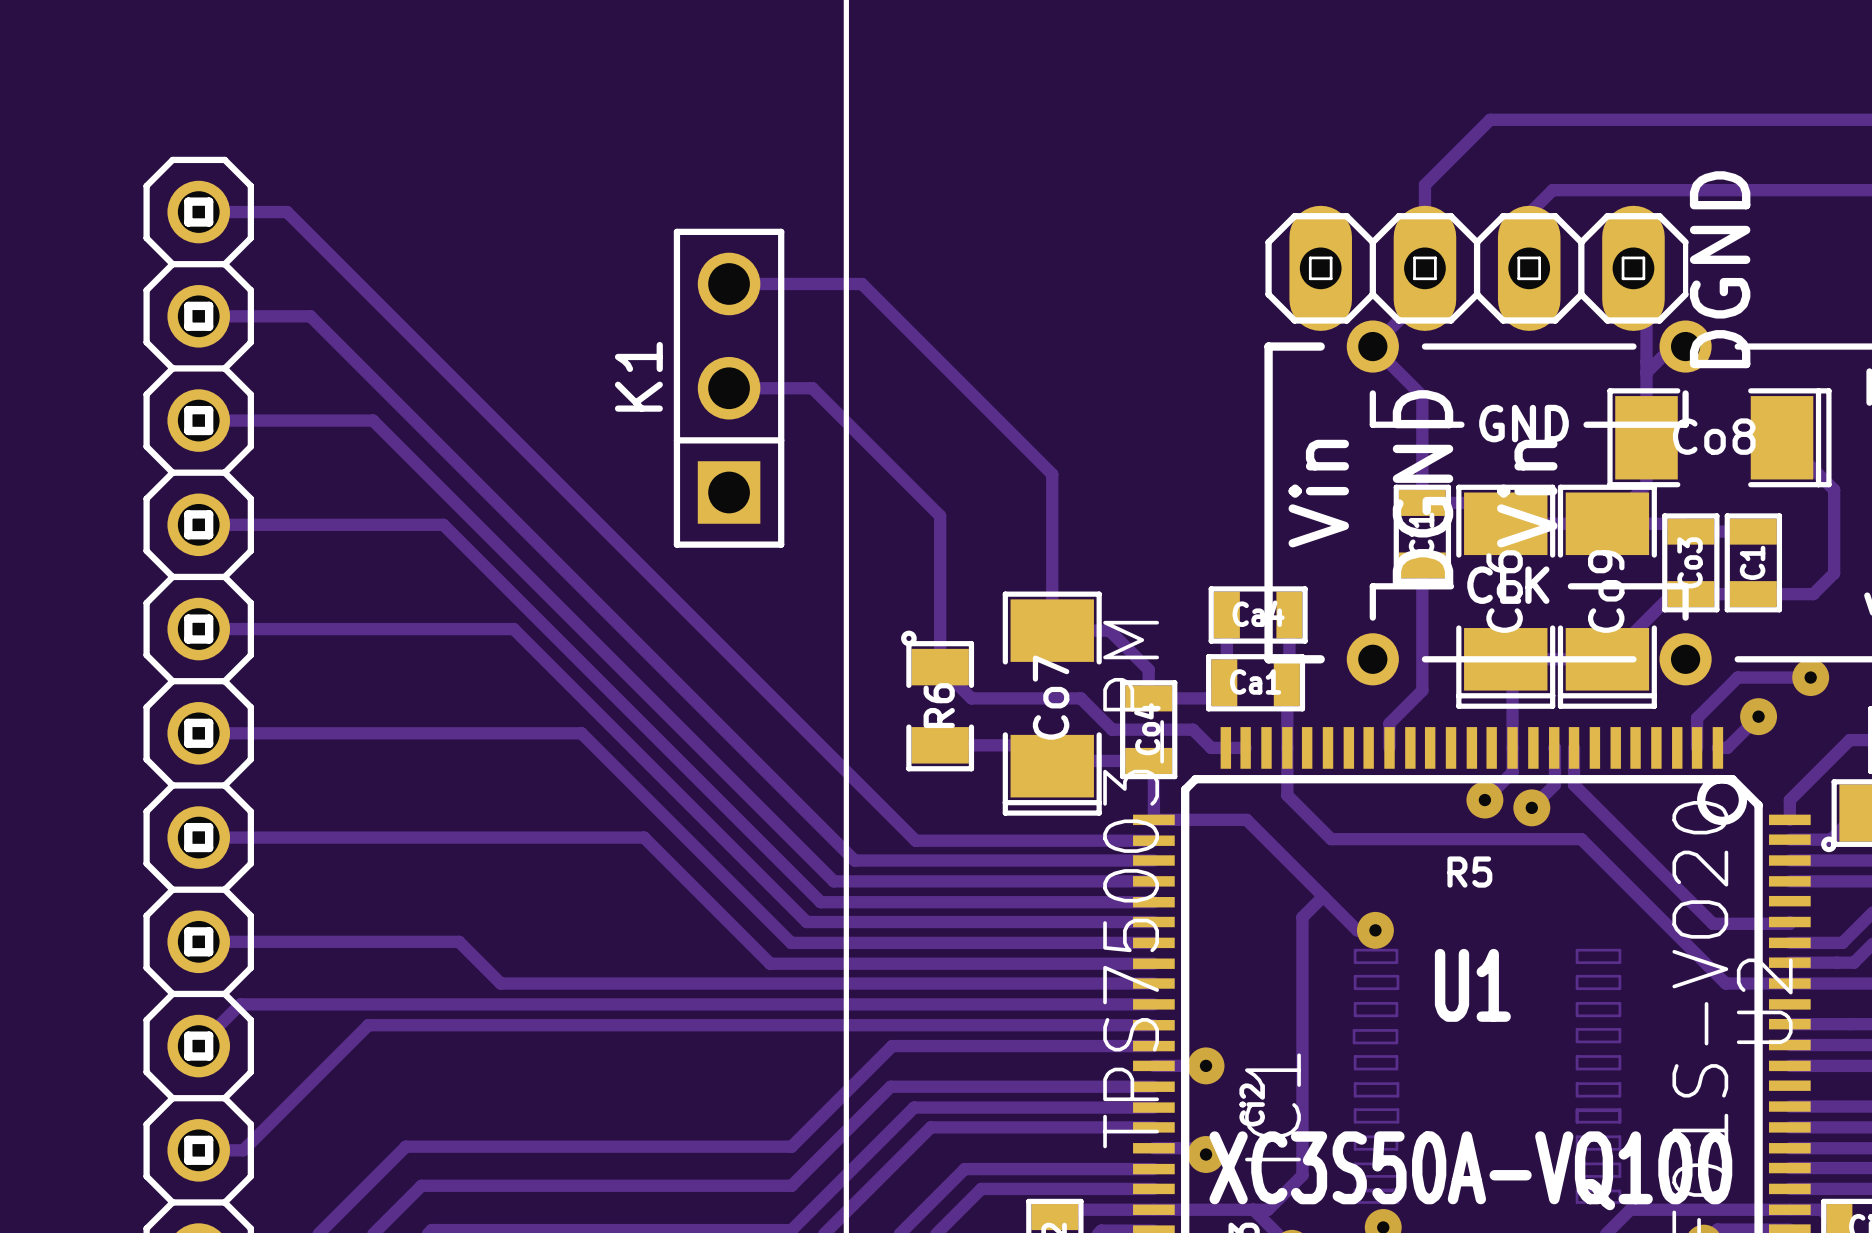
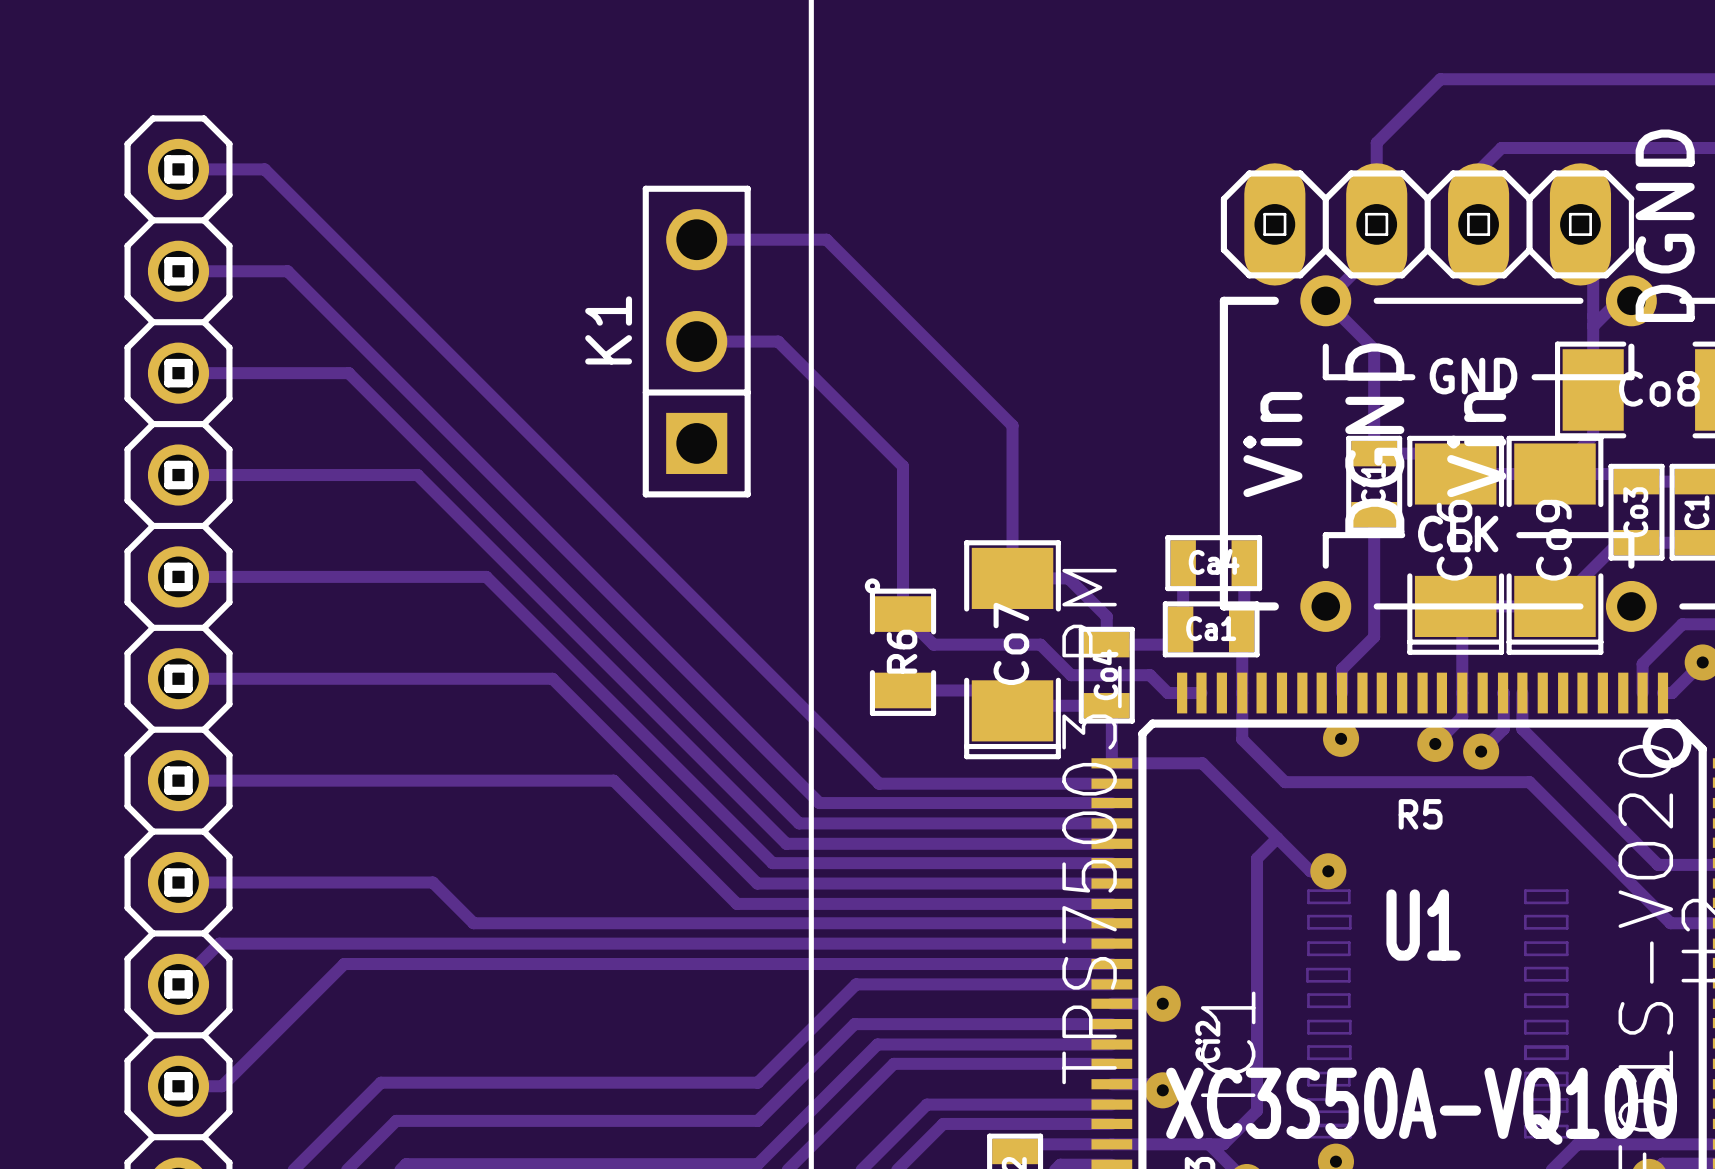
via: none -> (1341, 738)

